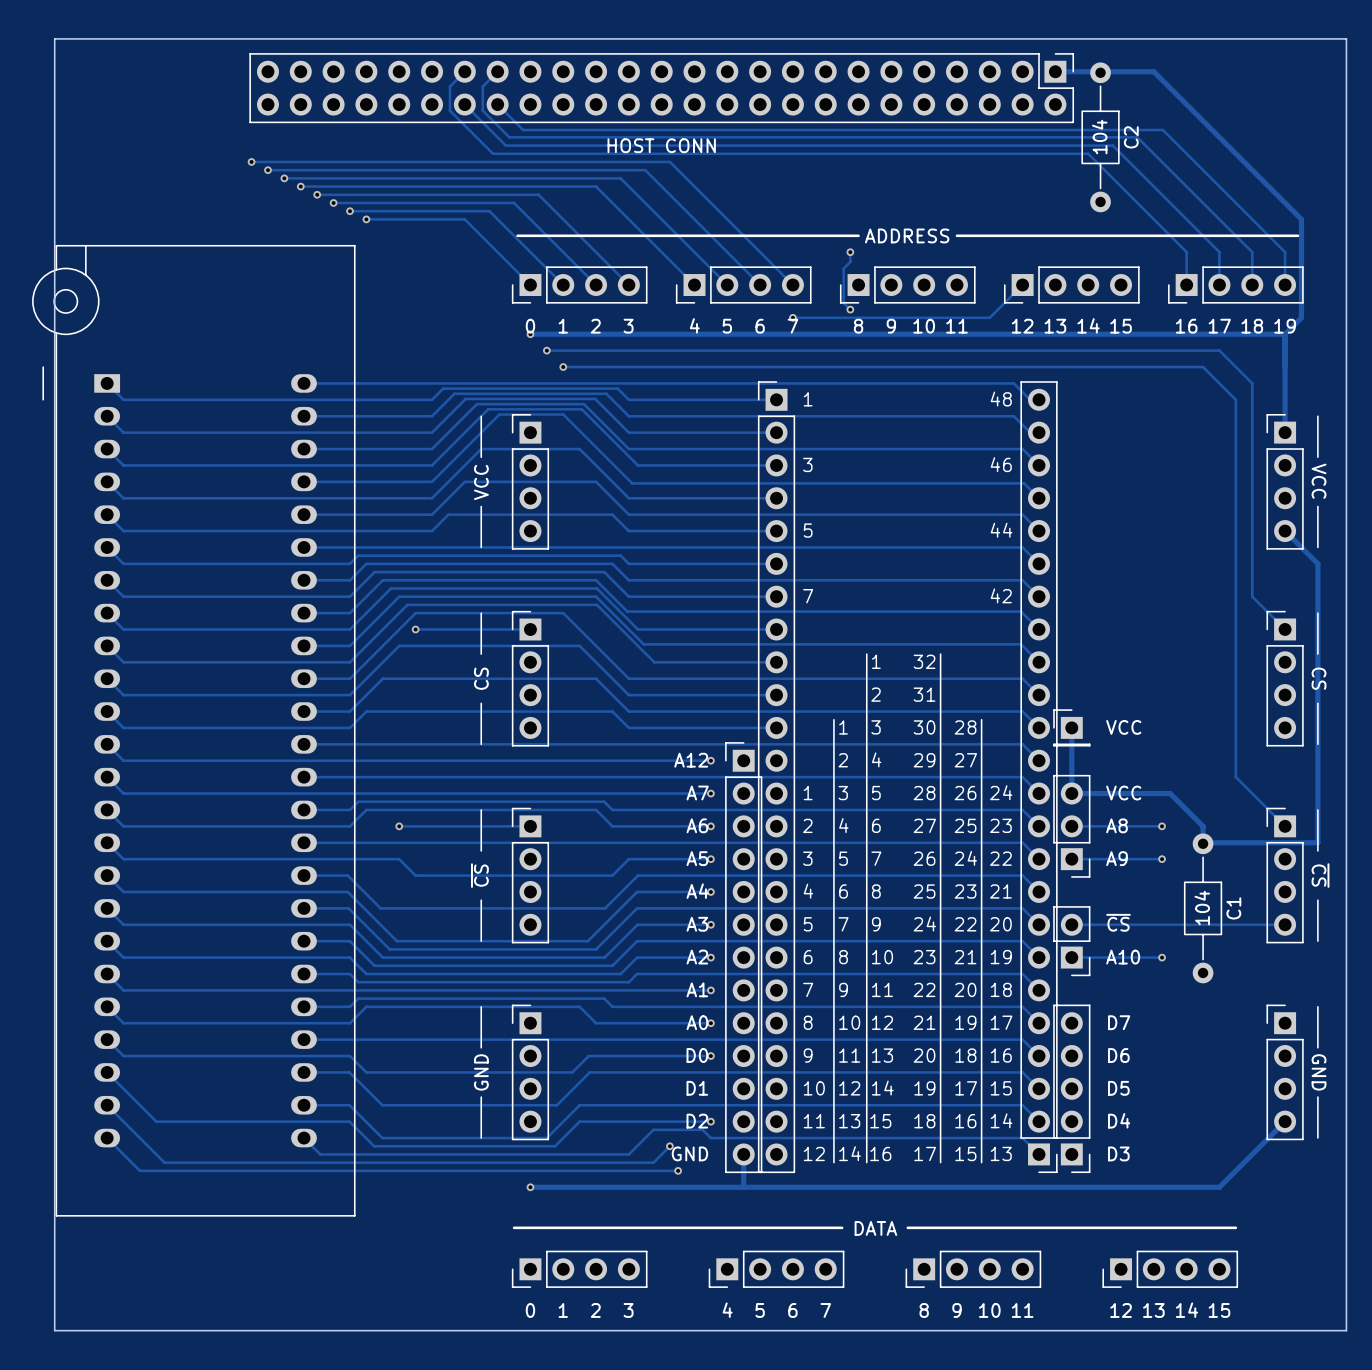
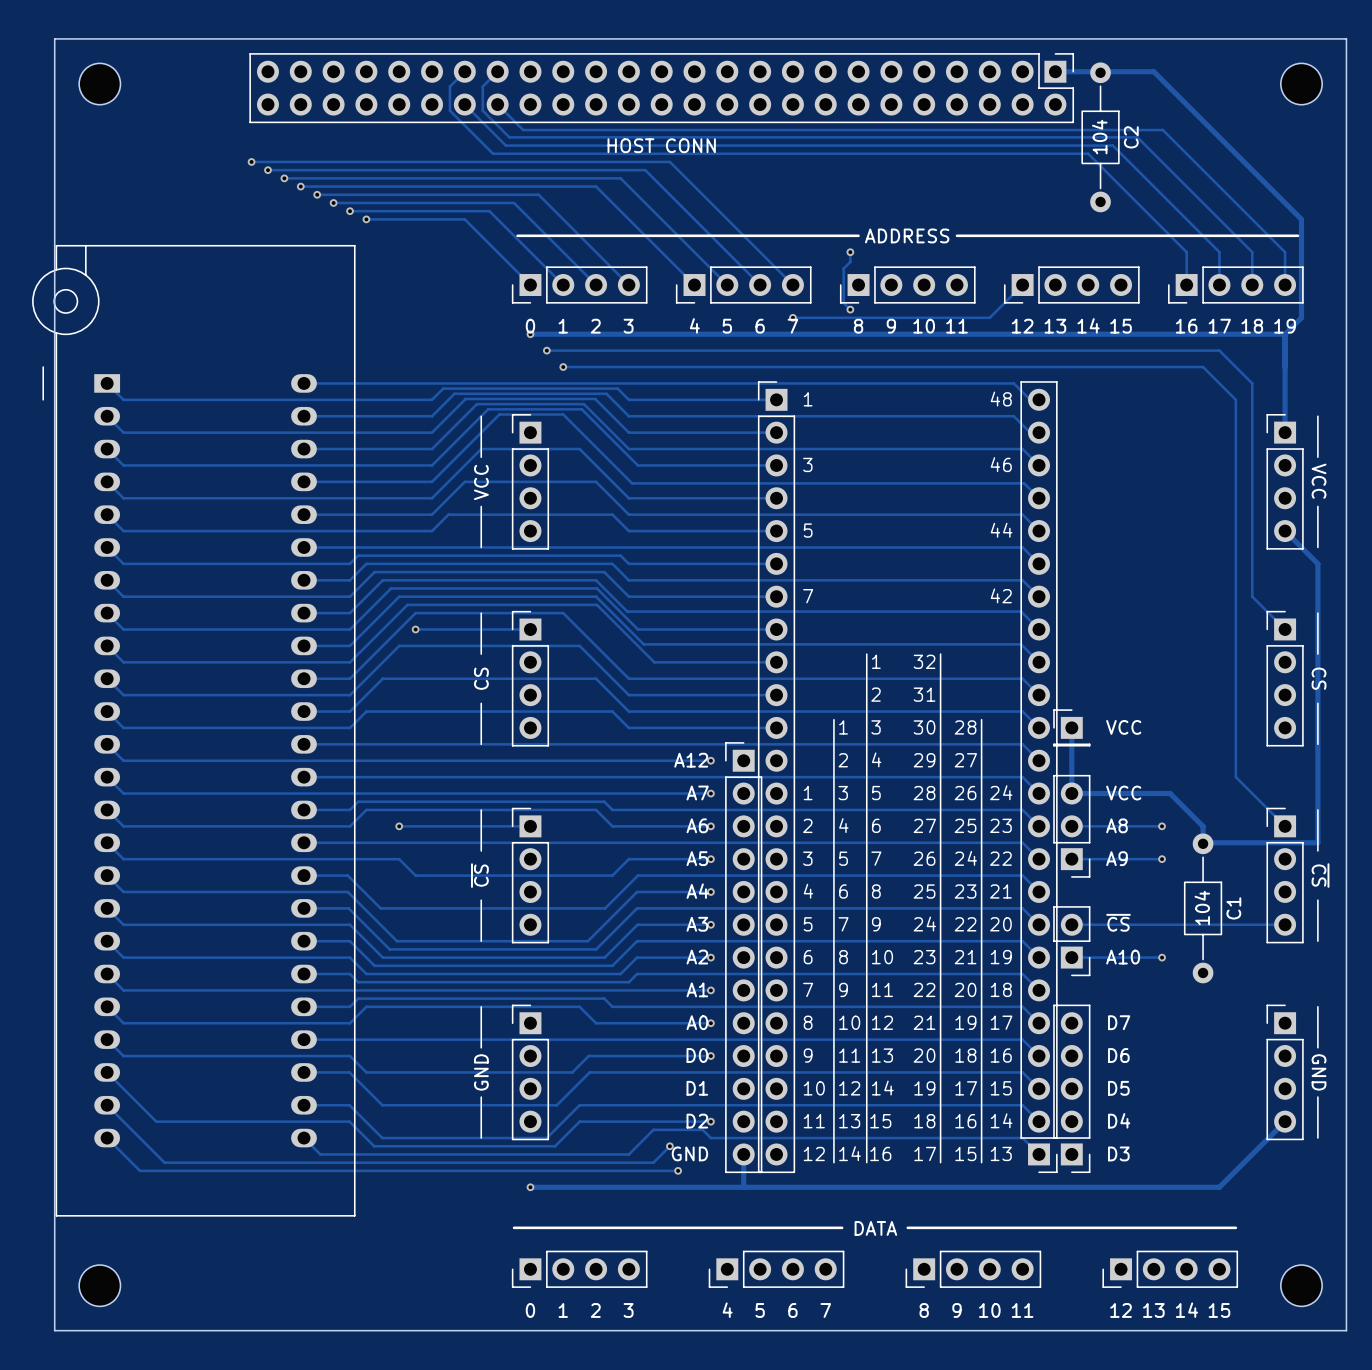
part: none -> (99, 84)
part: none -> (1301, 84)
part: none -> (99, 1285)
part: none -> (1301, 1285)

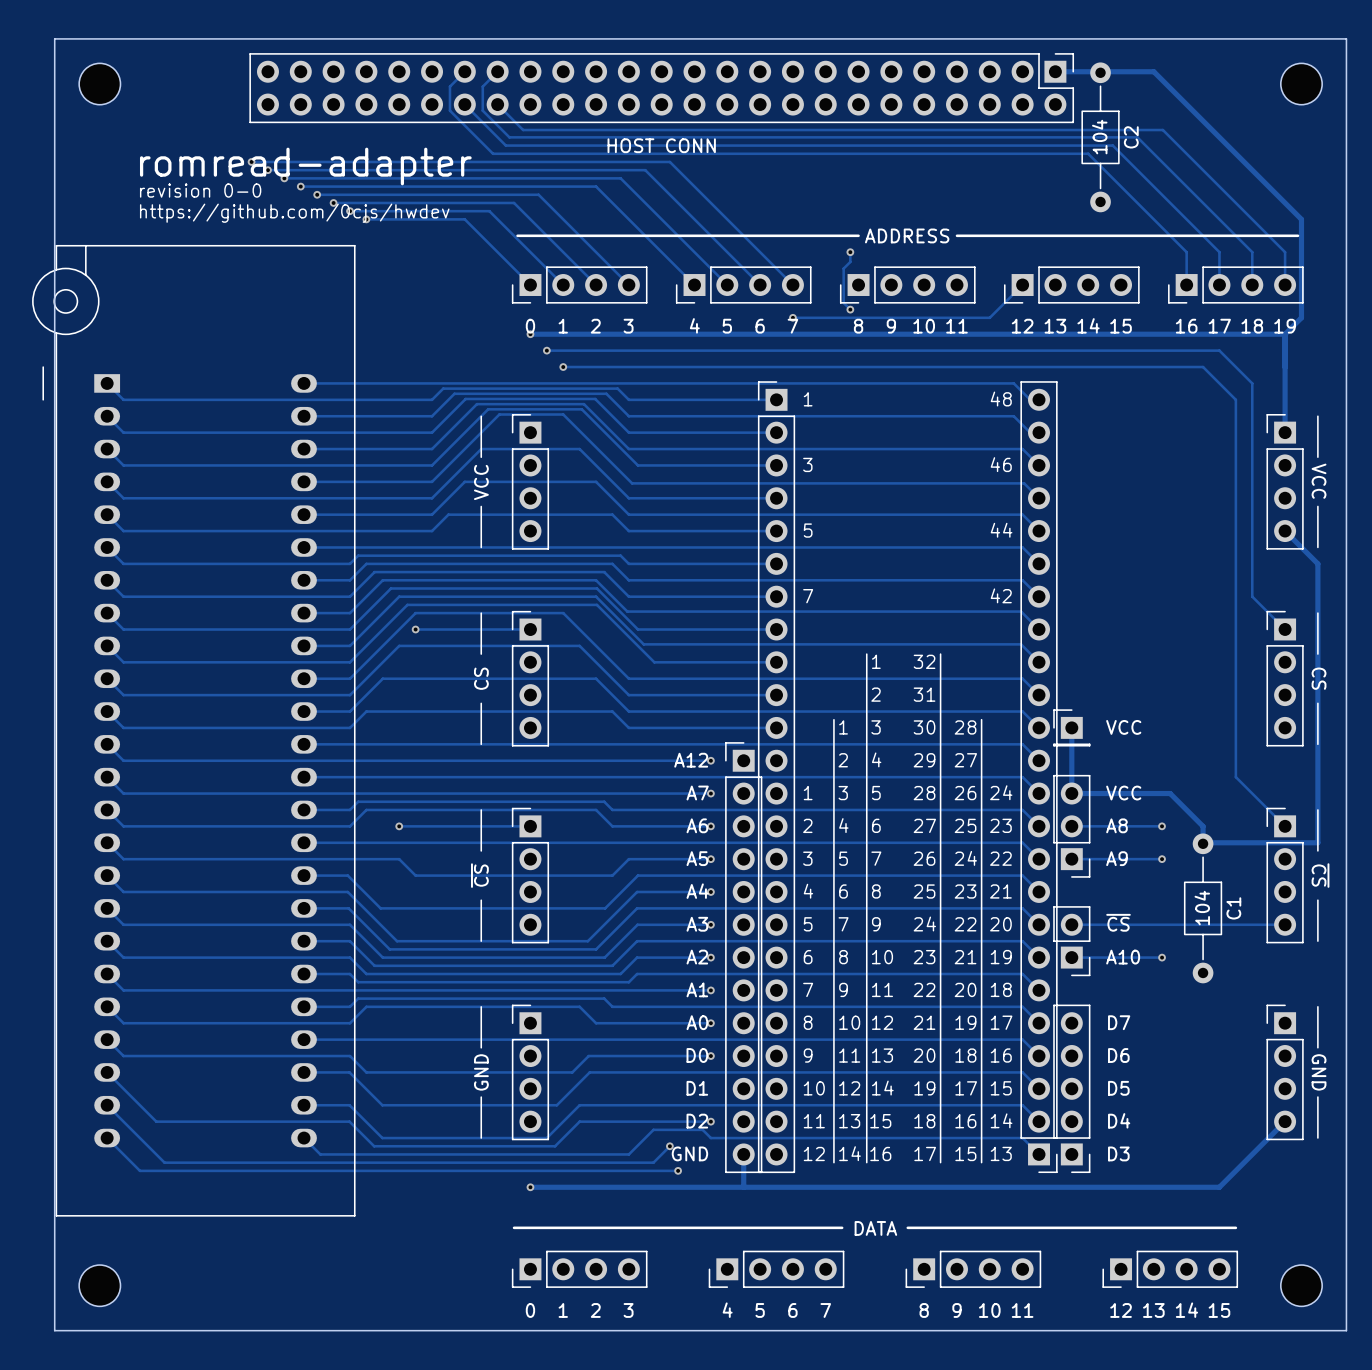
text: none -> romread-adapter (305, 166)
text: none -> revision 0-0 (200, 190)
text: none -> https://github.com/0cjs/hwdev (294, 213)

